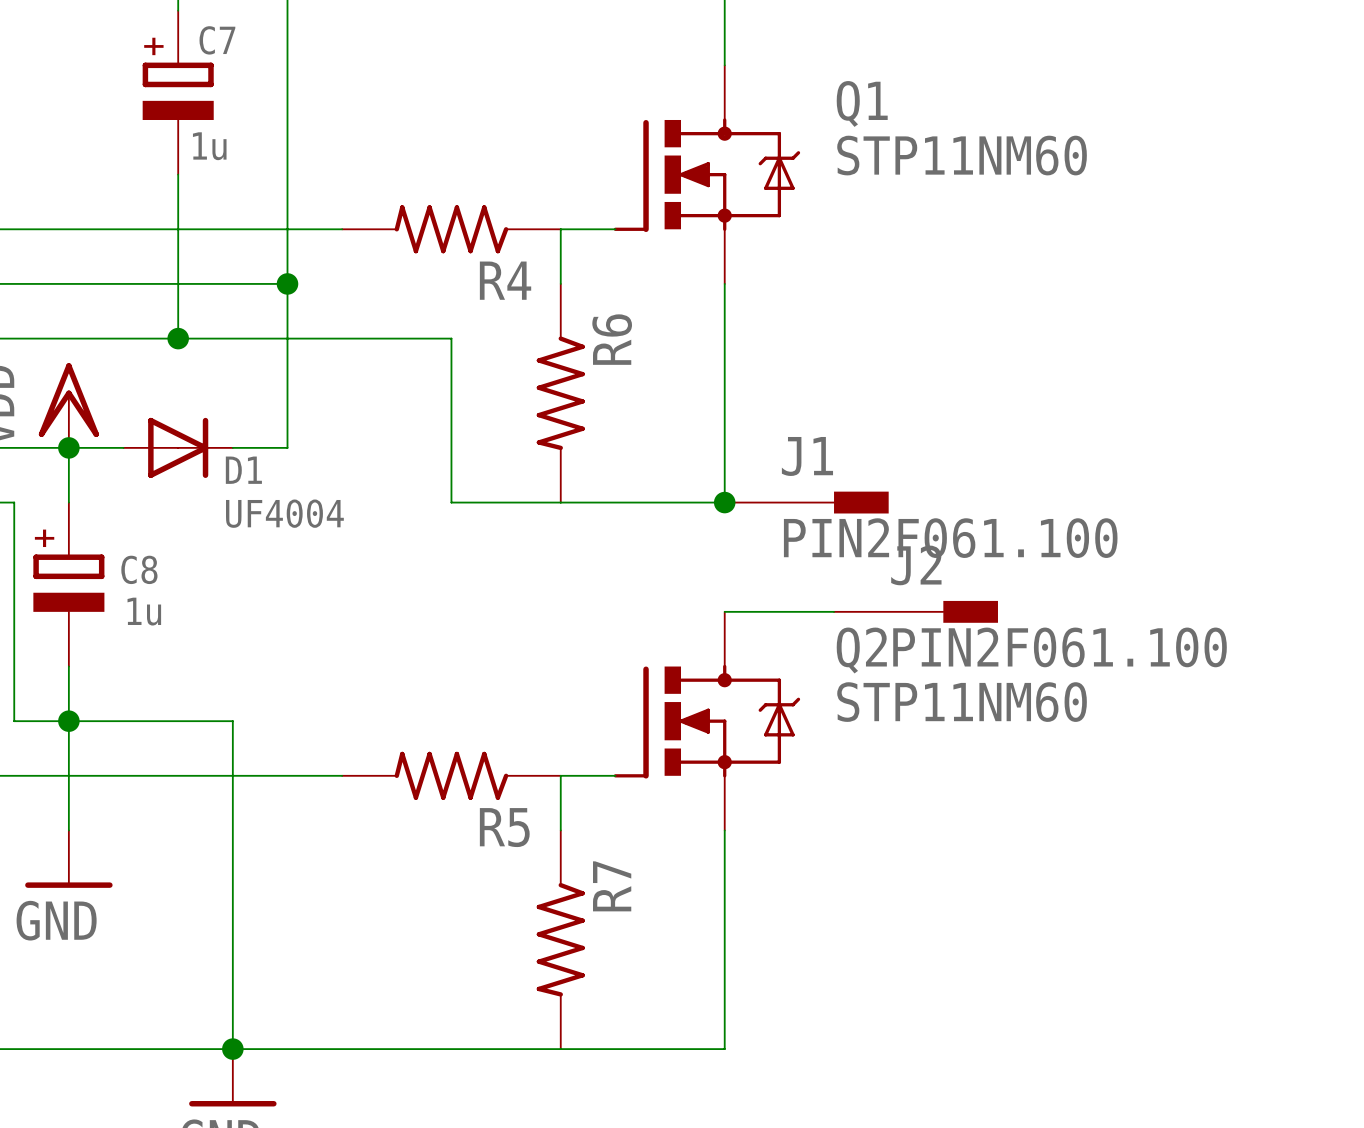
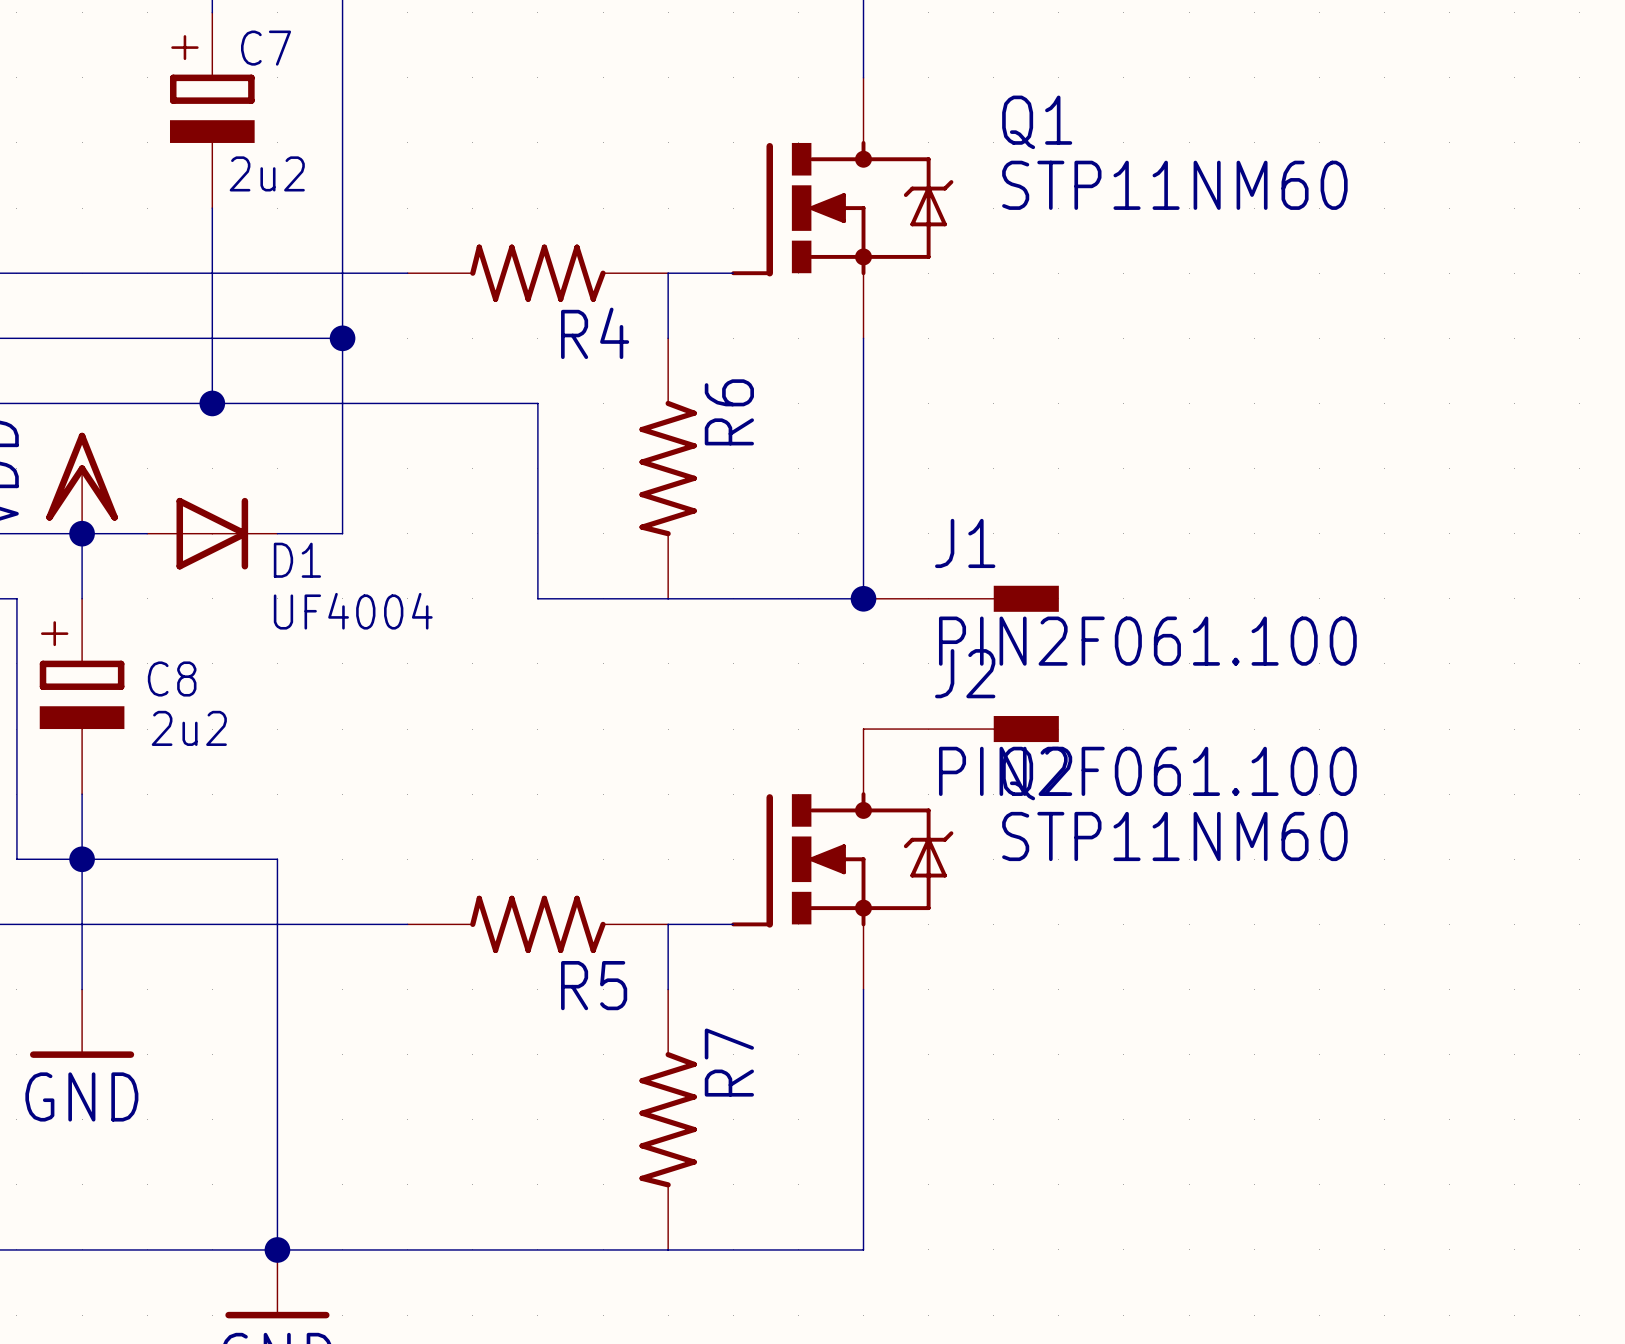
C7 value: 1u (209, 146) -> 2u2 (267, 173)
C8 value: 1u (144, 611) -> 2u2 (189, 728)
J2 position: (916, 611) -> (961, 729)

